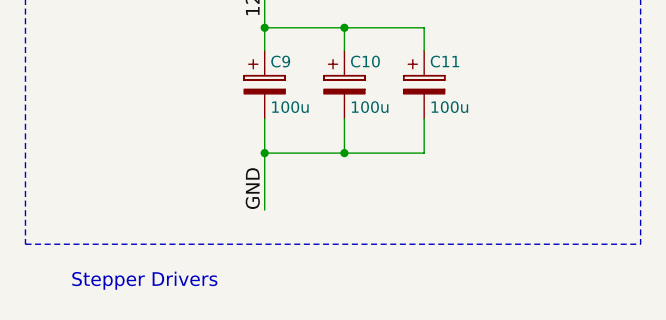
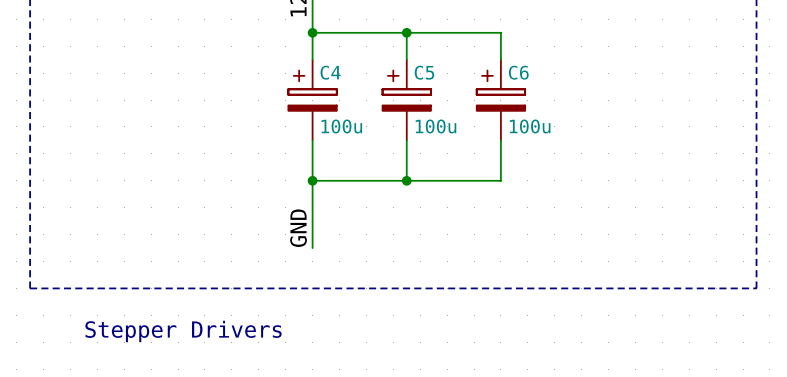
C9 name: C9 (280, 61) -> C4 (330, 72)
C10 name: C10 (365, 61) -> C5 (424, 72)
C11 name: C11 (444, 61) -> C6 (518, 72)

